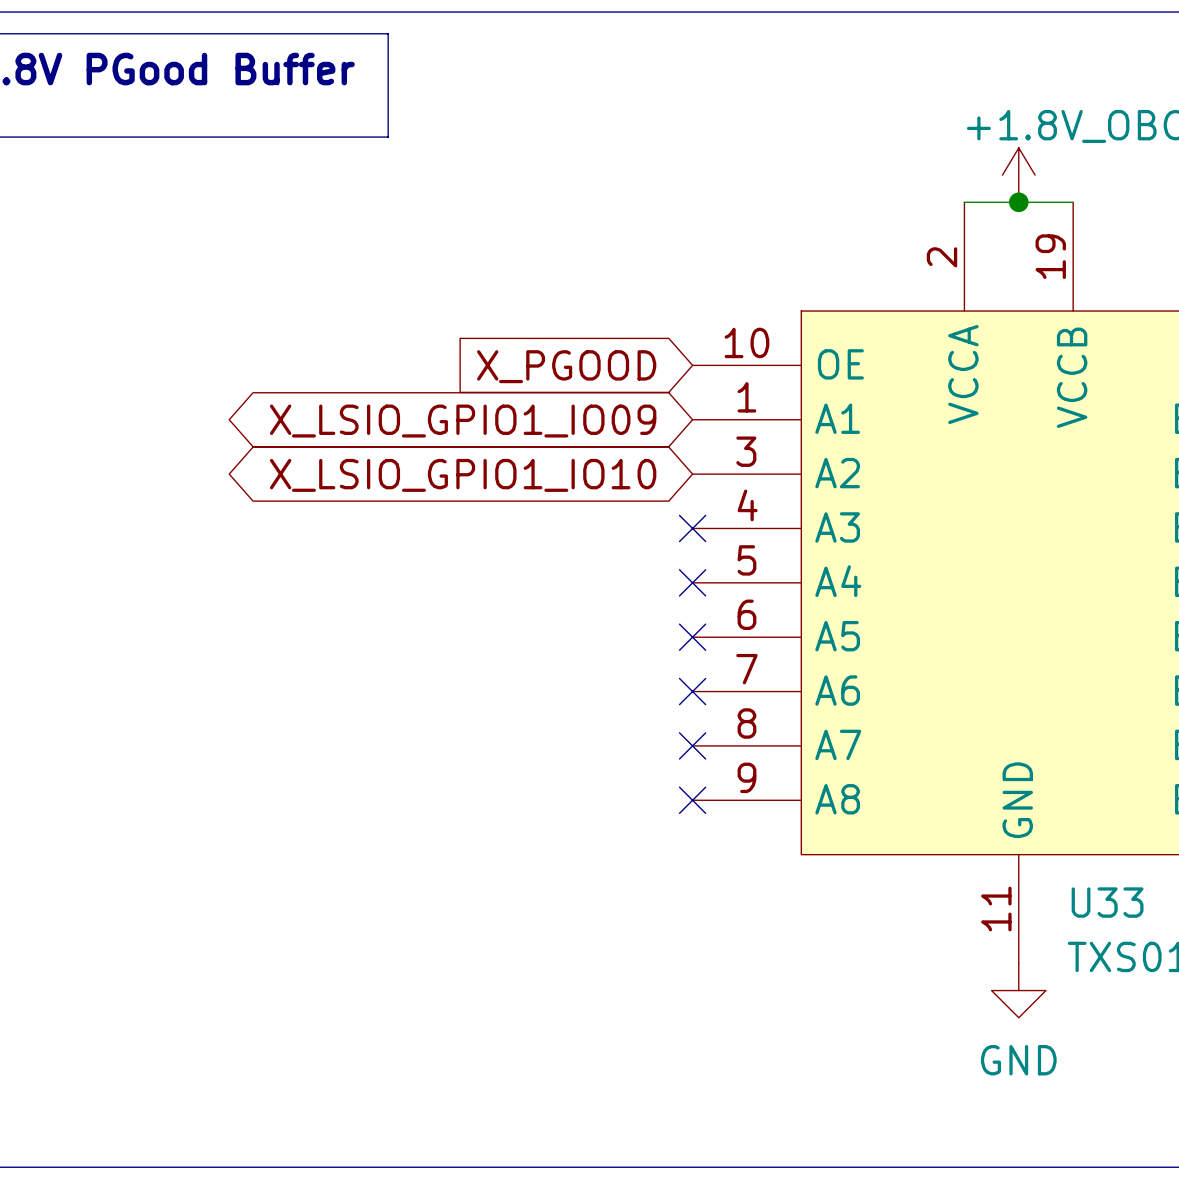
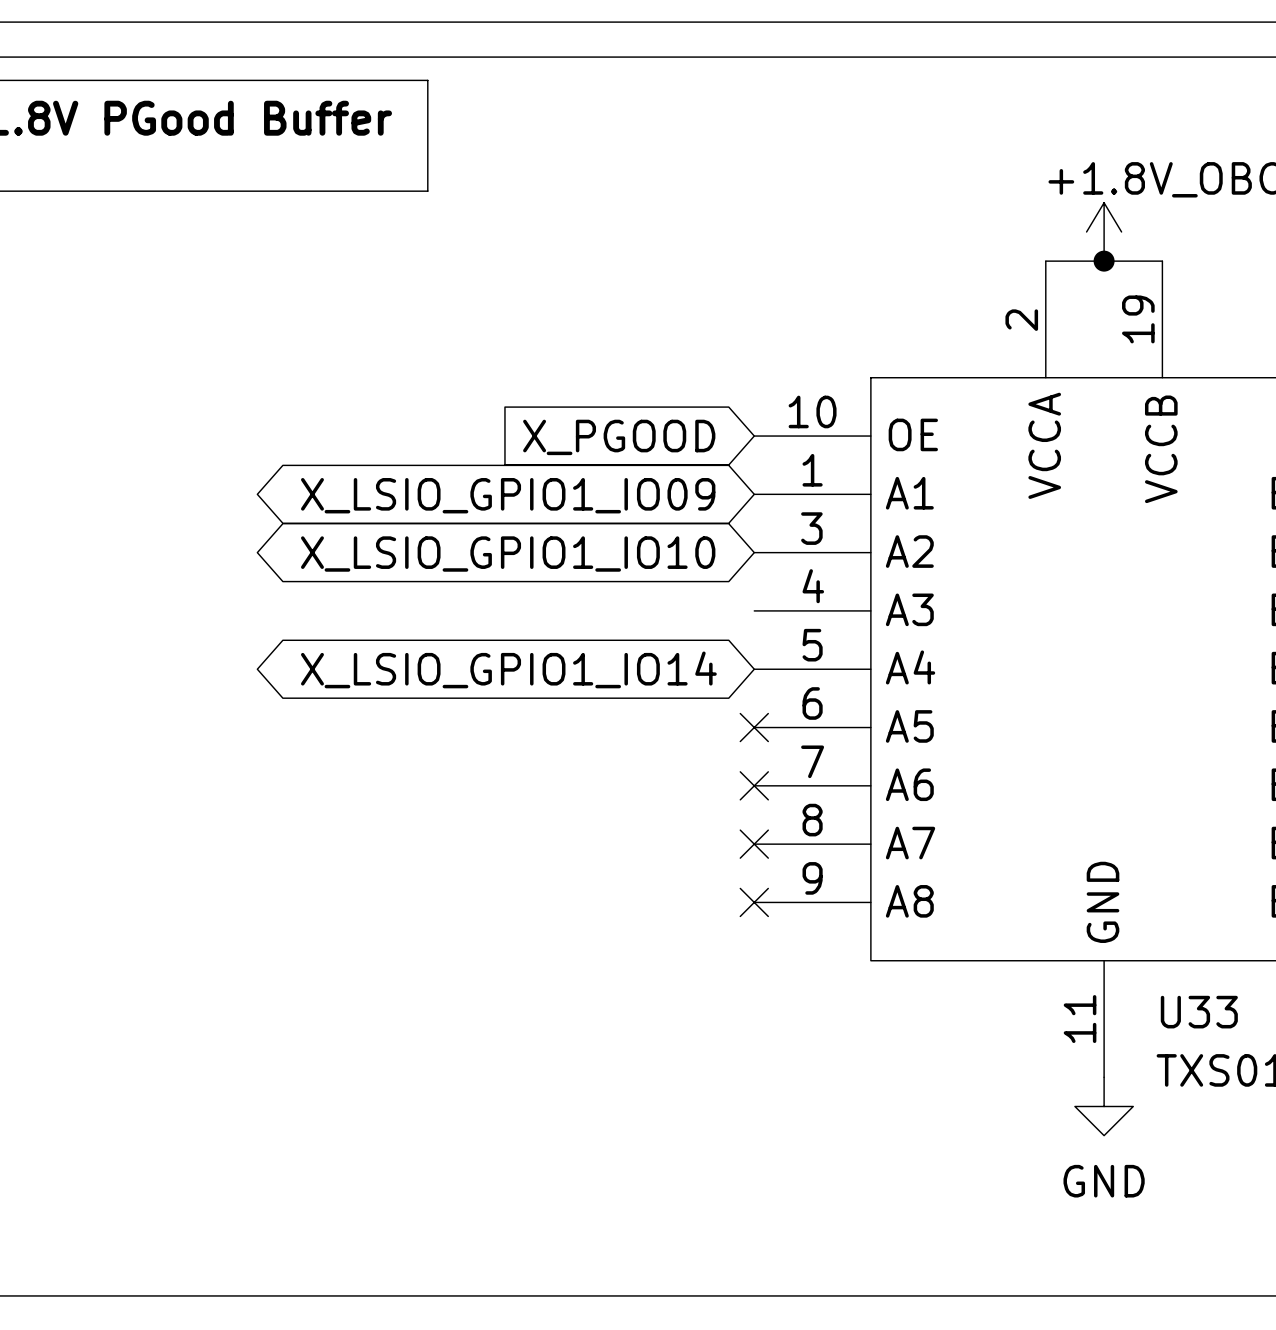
no-connect mark: (692, 528) -> none
no-connect mark: (692, 582) -> none
global label: none -> X_LSIO_GPIO1_IO14 (508, 669)

